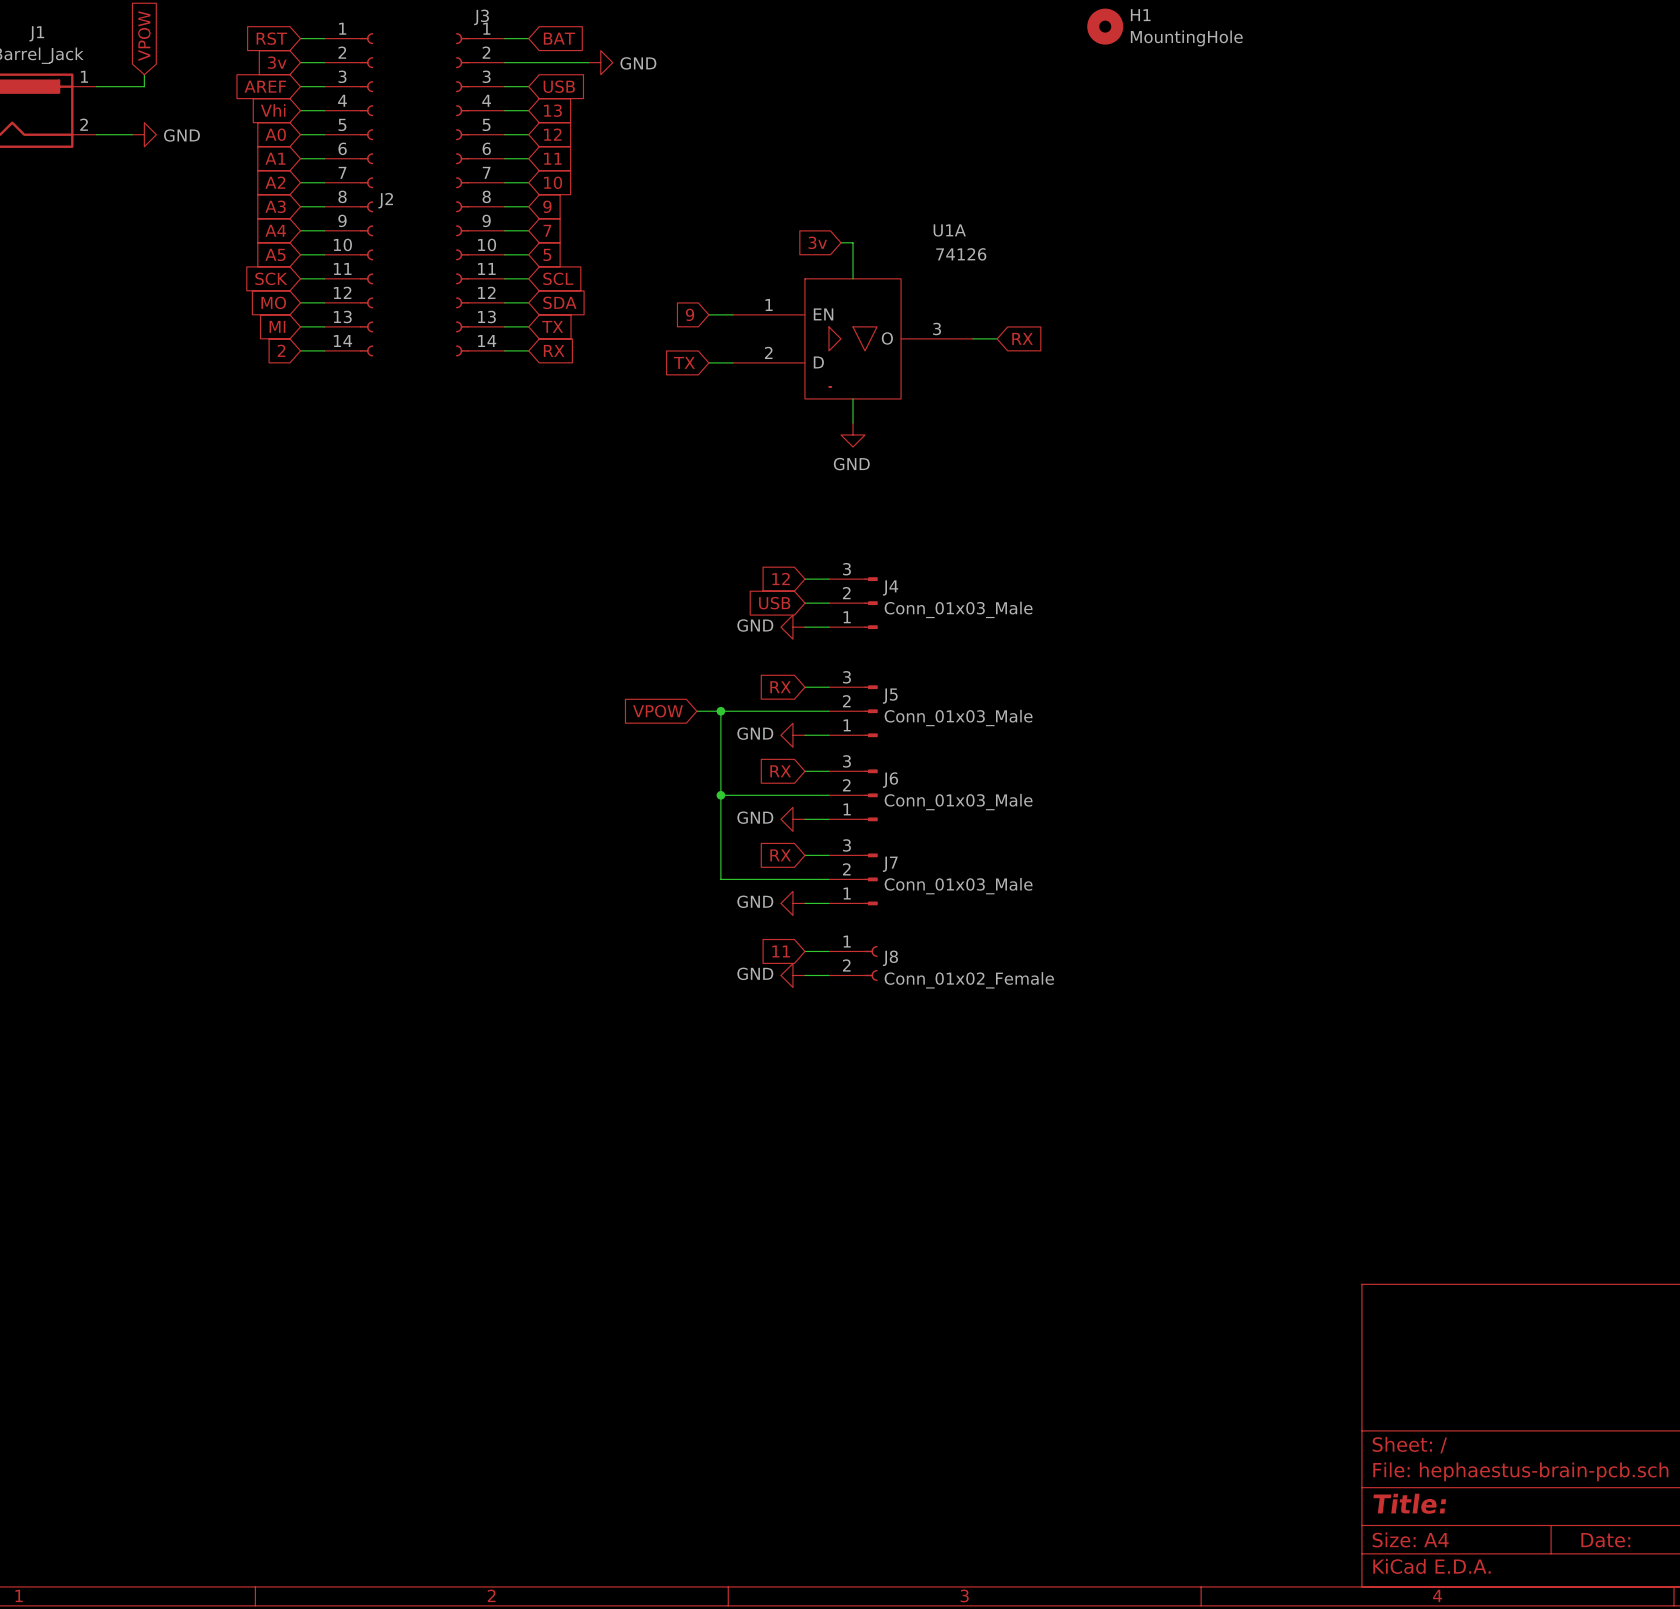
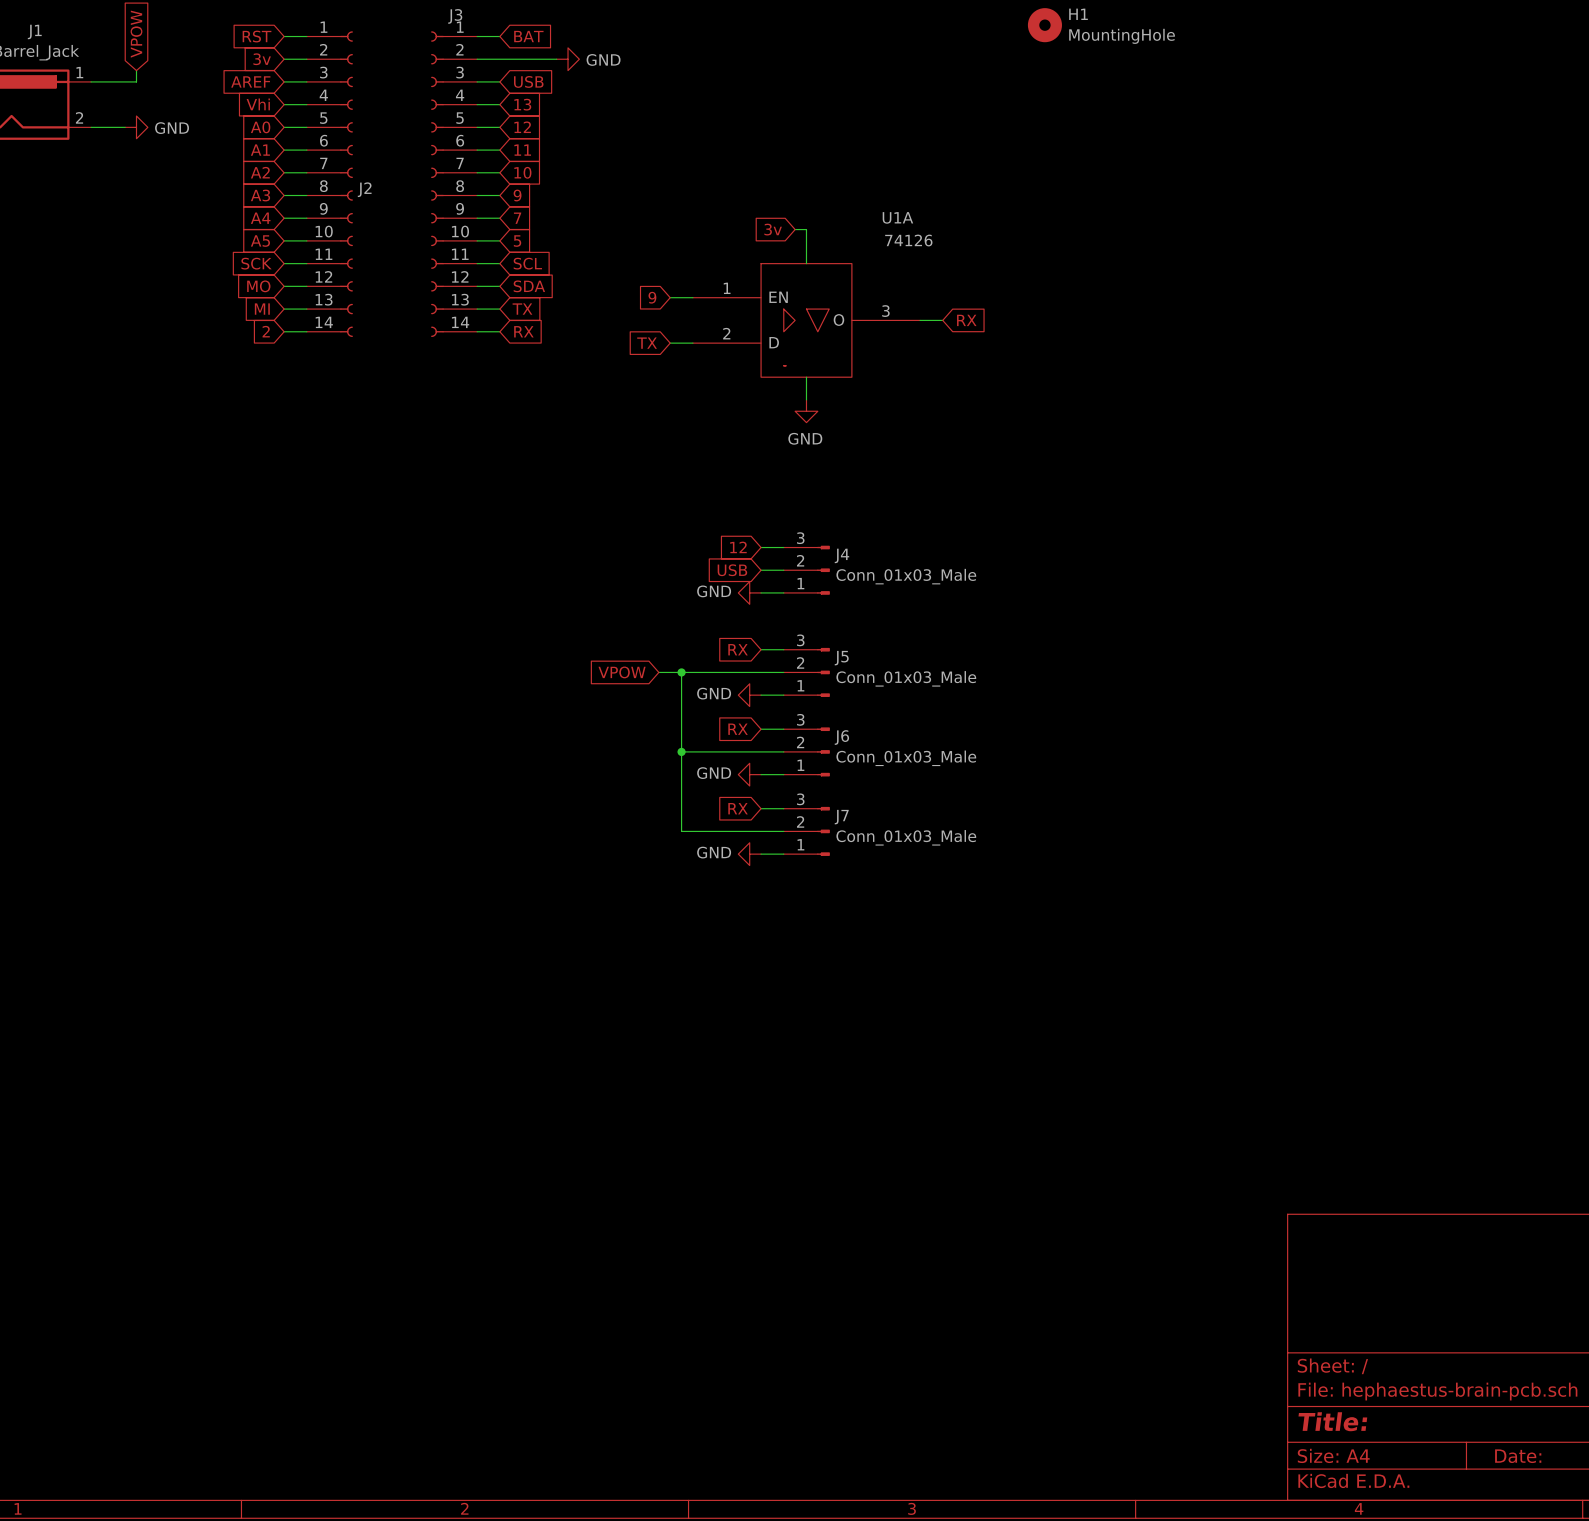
global label: 11 (781, 951) -> none
wire: (804, 951) (828, 951) -> none
J8: Conn_01x02_Female (853, 963) -> none
power symbol: GND (792, 975) -> none
wire: (804, 975) (828, 975) -> none

